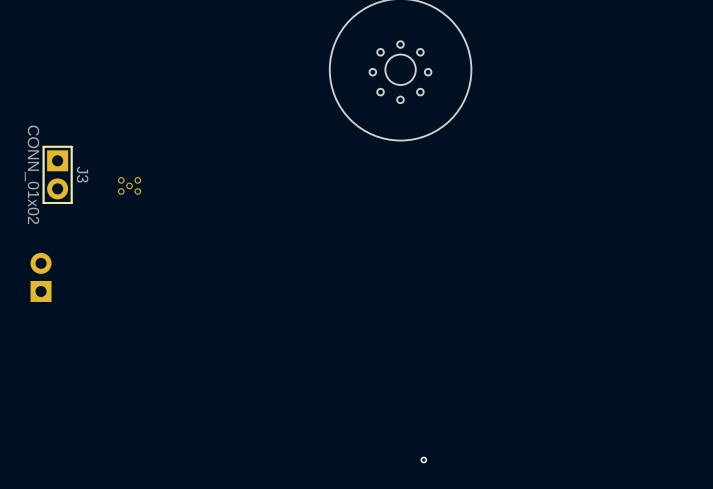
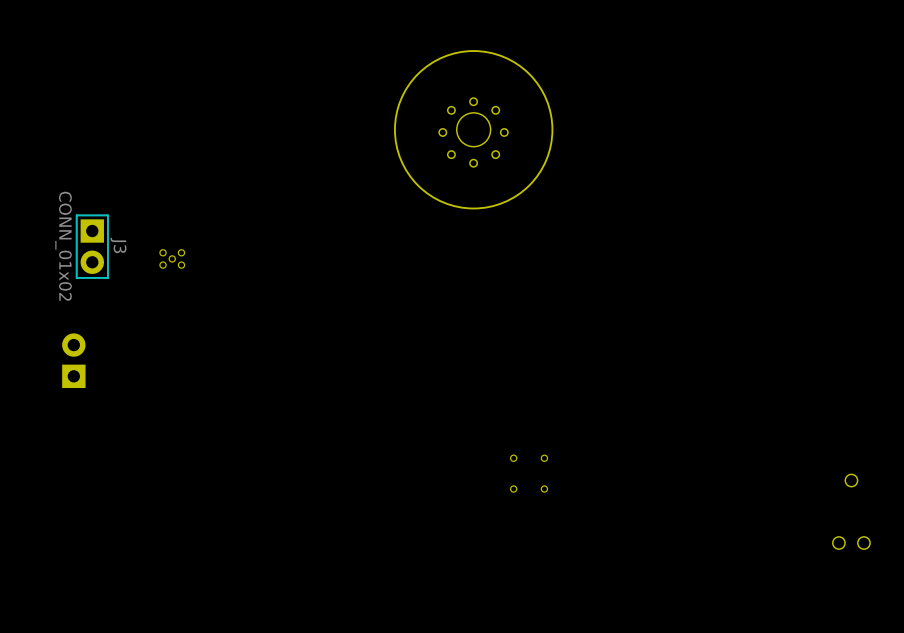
part: none -> (529, 473)
via: (423, 460) -> none

